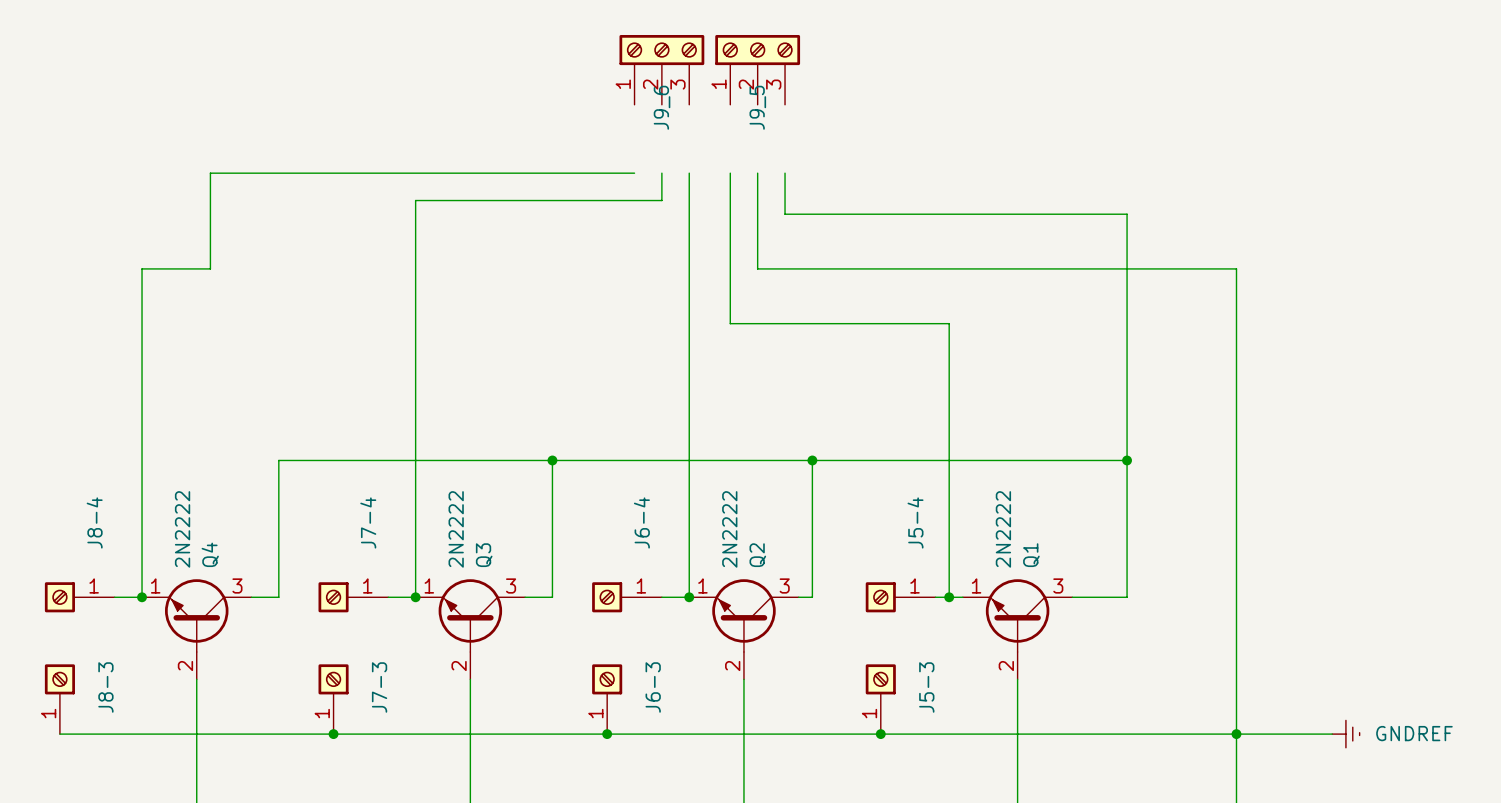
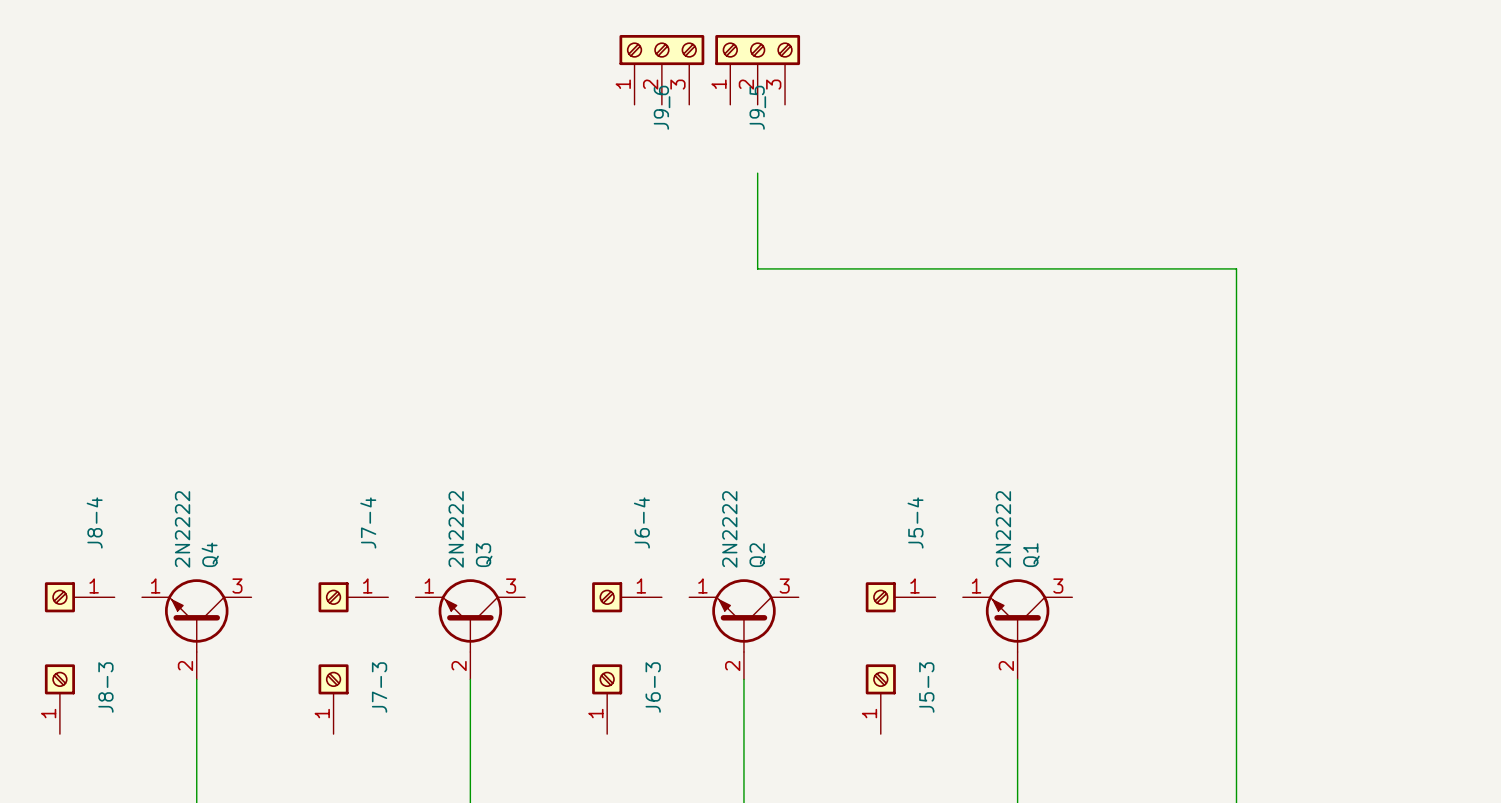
wire: (634, 173) (210, 173) (210, 268) (142, 268) (142, 597) (114, 597) -> none
wire: (661, 173) (661, 200) (415, 200) (415, 597) (388, 597) -> none
wire: (689, 173) (689, 597) (661, 597) -> none
wire: (730, 173) (730, 323) (949, 323) (949, 597) -> none
wire: (785, 173) (785, 214) (1127, 214) (1127, 597) (1072, 597) -> none
wire: (552, 460) (552, 597) (525, 597) -> none
junction: (552, 460) -> none
wire: (812, 460) (812, 597) (798, 597) -> none
junction: (812, 460) -> none
wire: (1127, 460) (278, 460) (278, 597) (251, 597) -> none
junction: (1127, 460) -> none
junction: (142, 597) -> none
junction: (415, 597) -> none
junction: (689, 597) -> none
wire: (935, 597) (962, 597) -> none
junction: (949, 597) -> none
wire: (59, 734) (1332, 734) -> none
junction: (333, 734) -> none
junction: (607, 734) -> none
junction: (880, 734) -> none
junction: (1236, 734) -> none
power symbol: GNDREF (1345, 734) -> none

